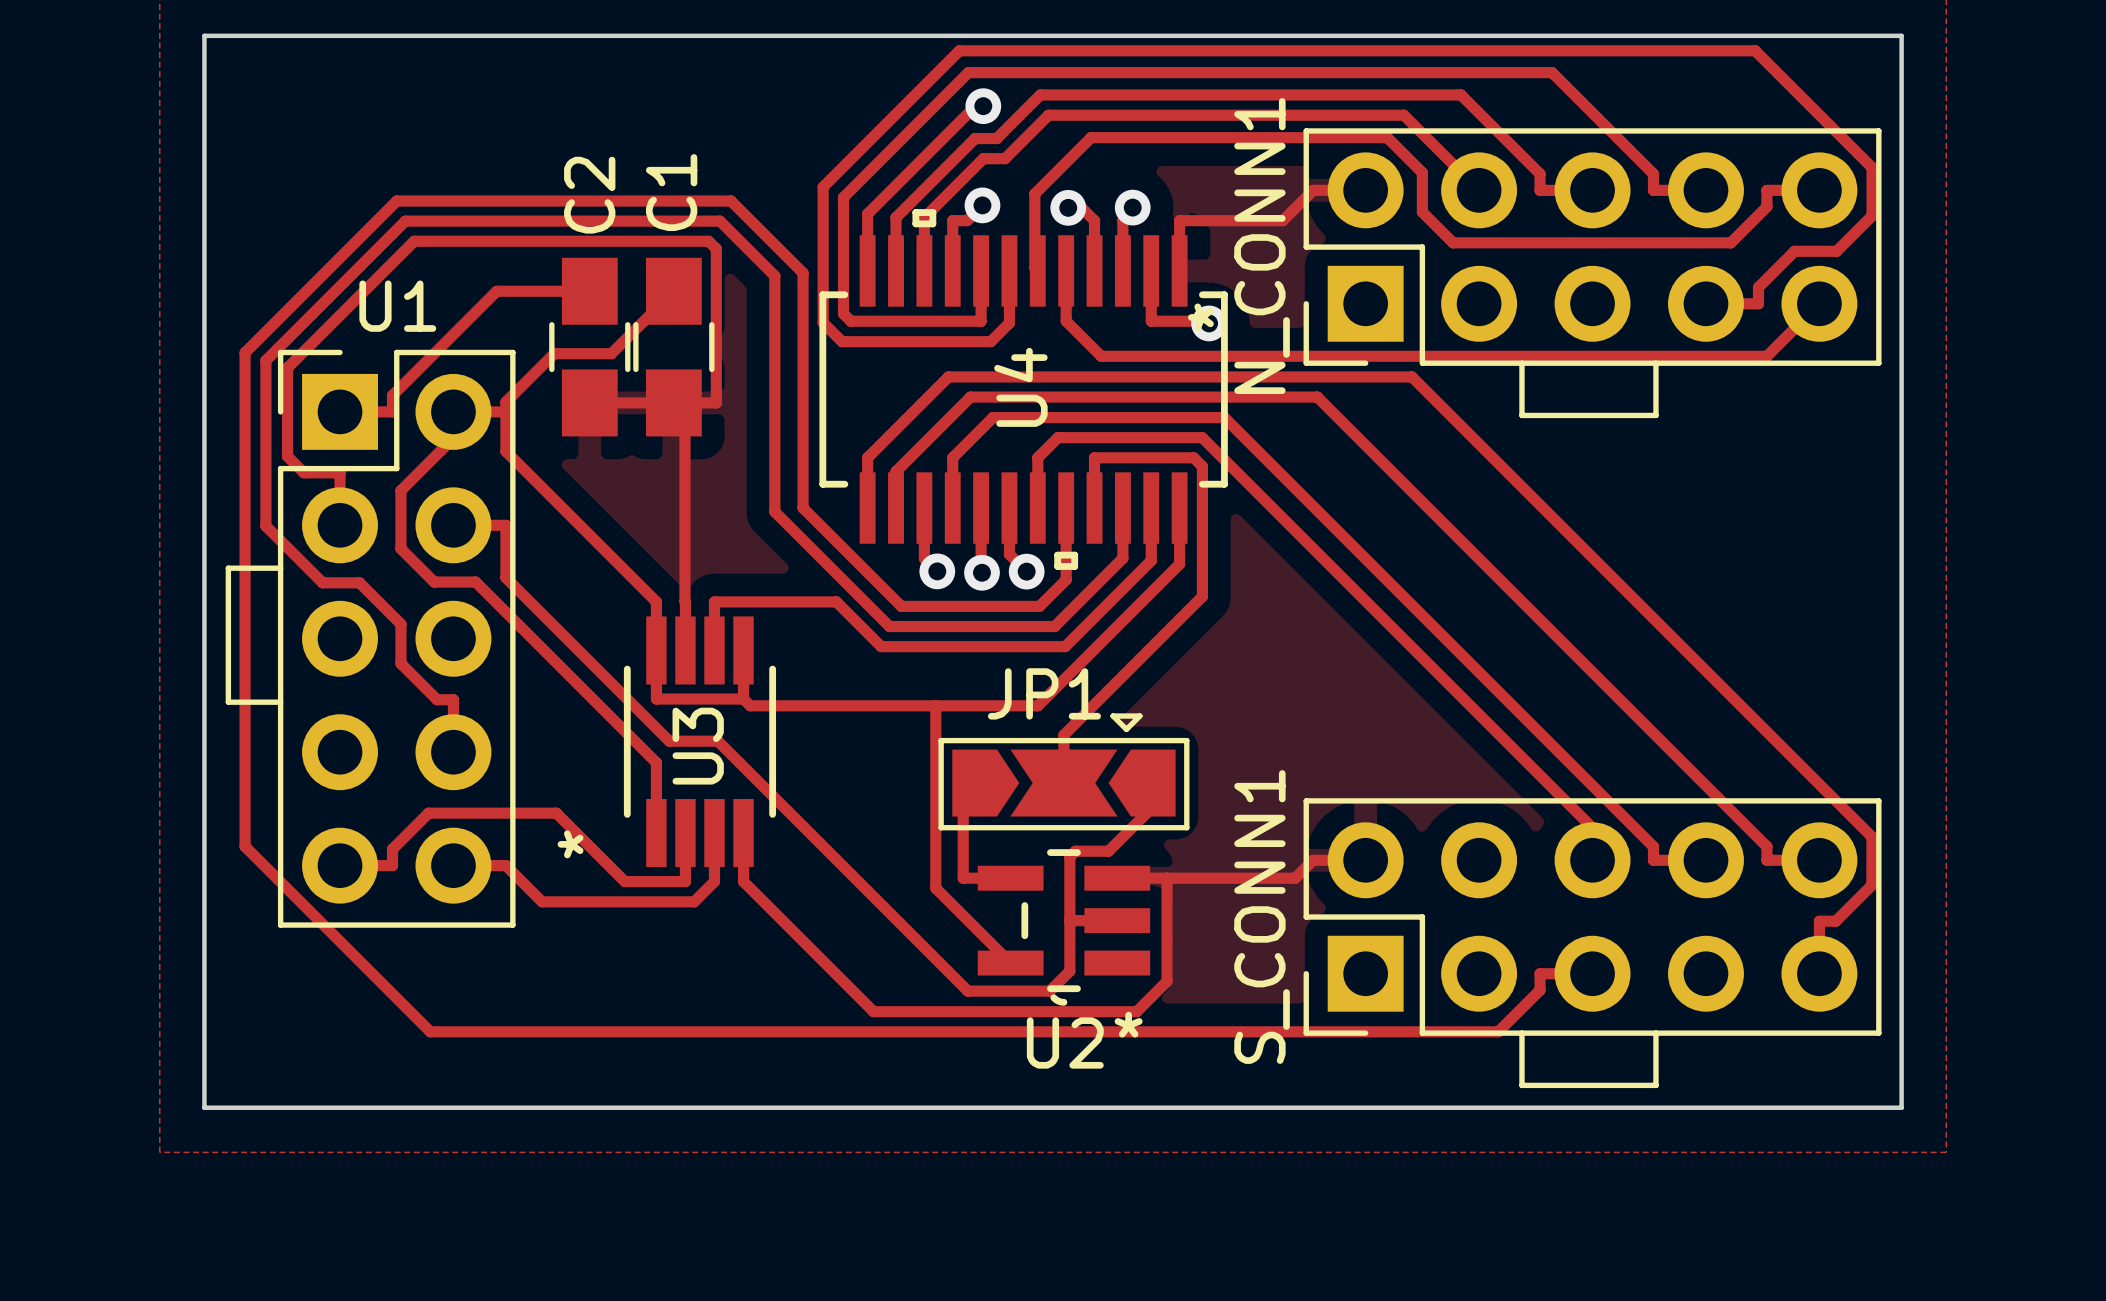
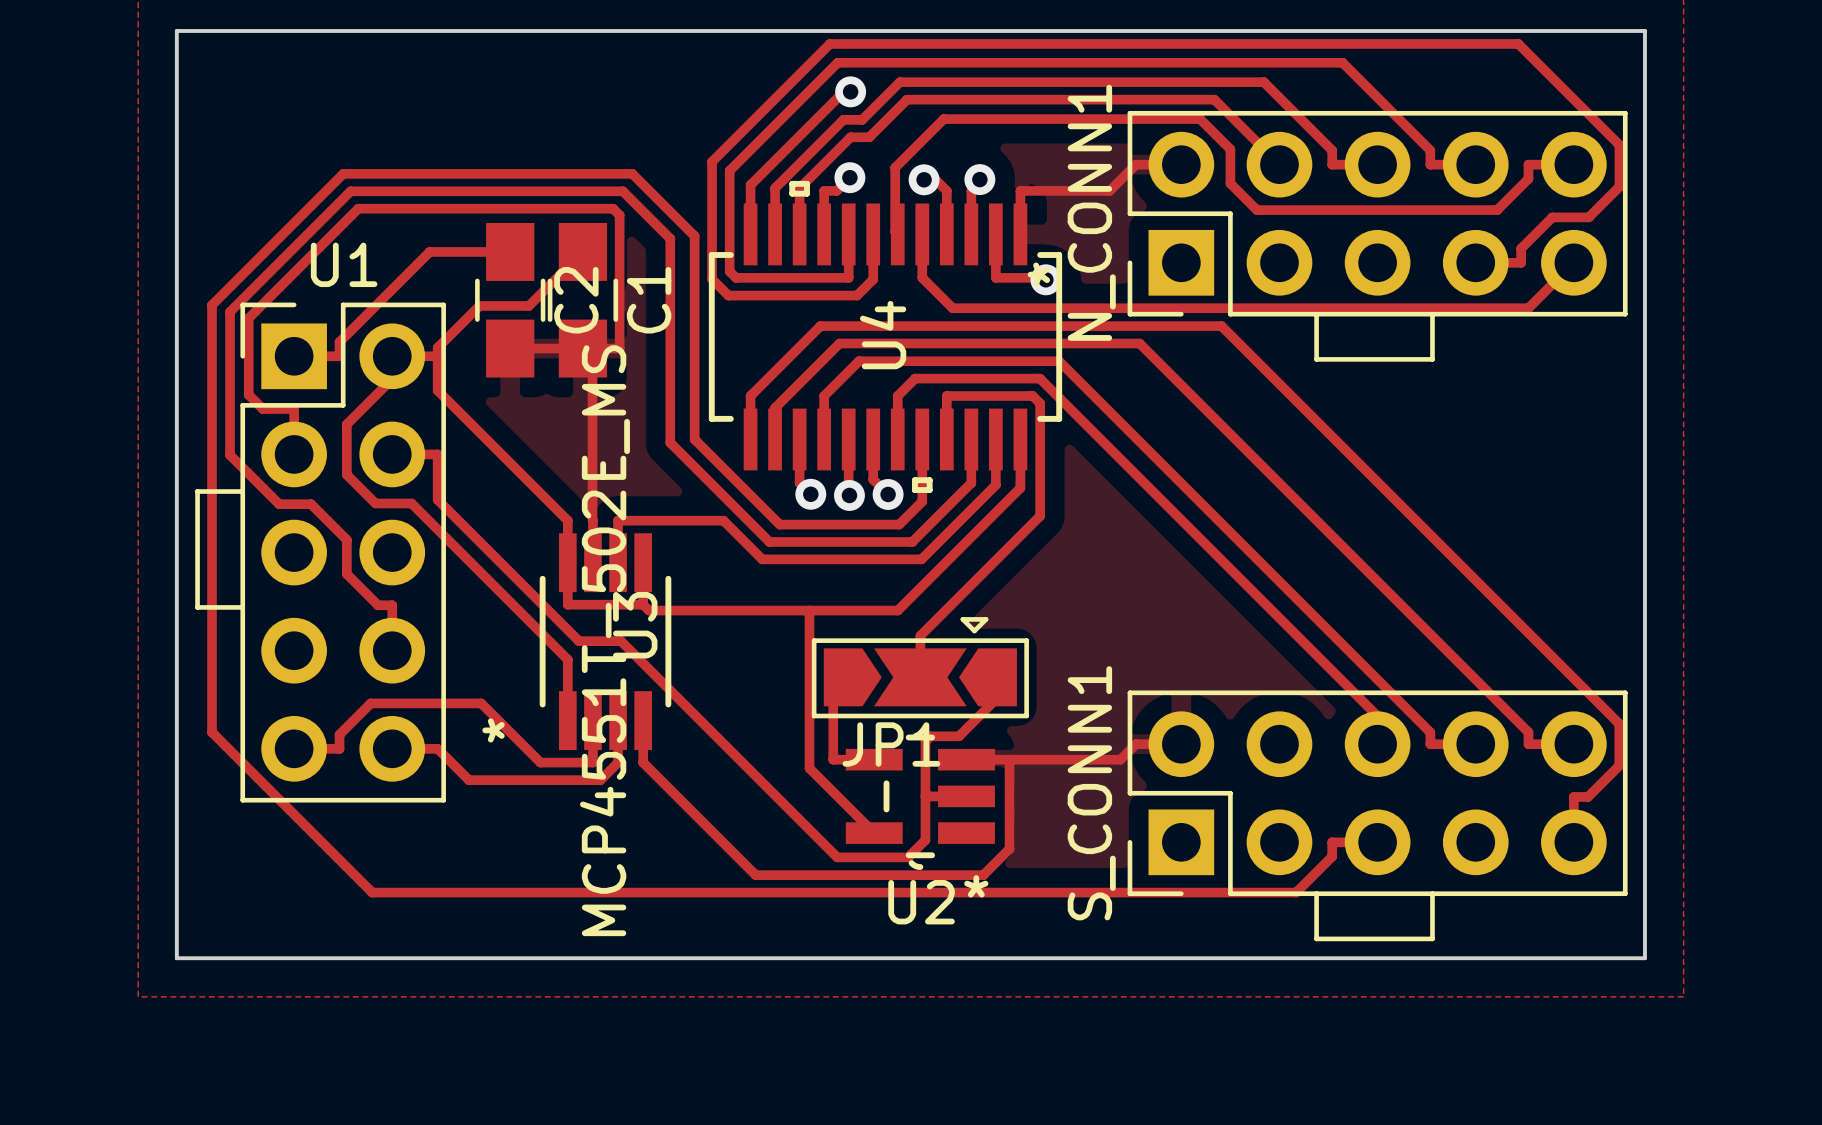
C1 name position: C1 (671, 192) -> C1 (649, 300)
C2 name position: C2 (589, 195) -> C2 (576, 300)
JP1 name position: JP1 (1044, 693) -> JP1 (891, 744)
U3 value: none -> MCP4551T-502E_MS (604, 640)
U3 name position: U3 (698, 746) -> U3 (635, 625)

